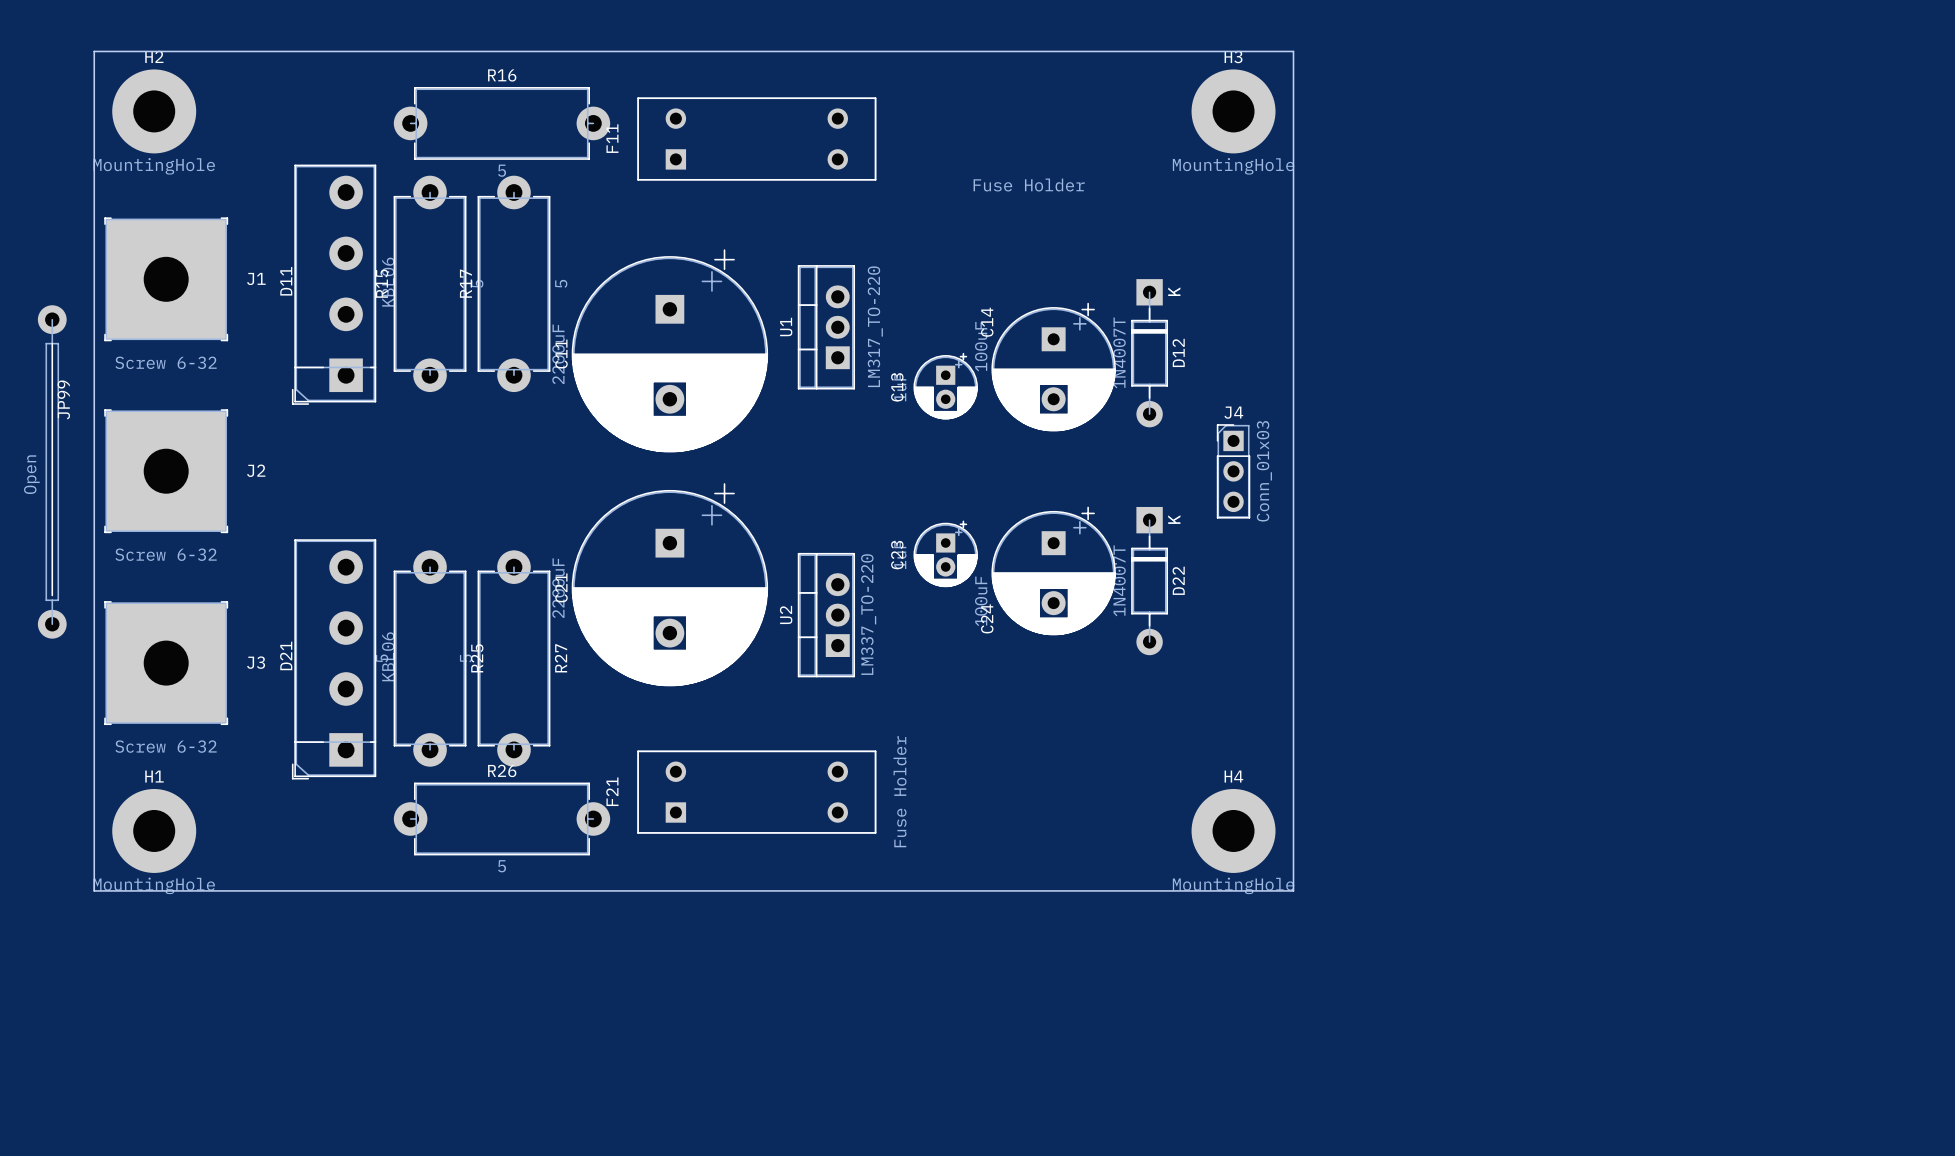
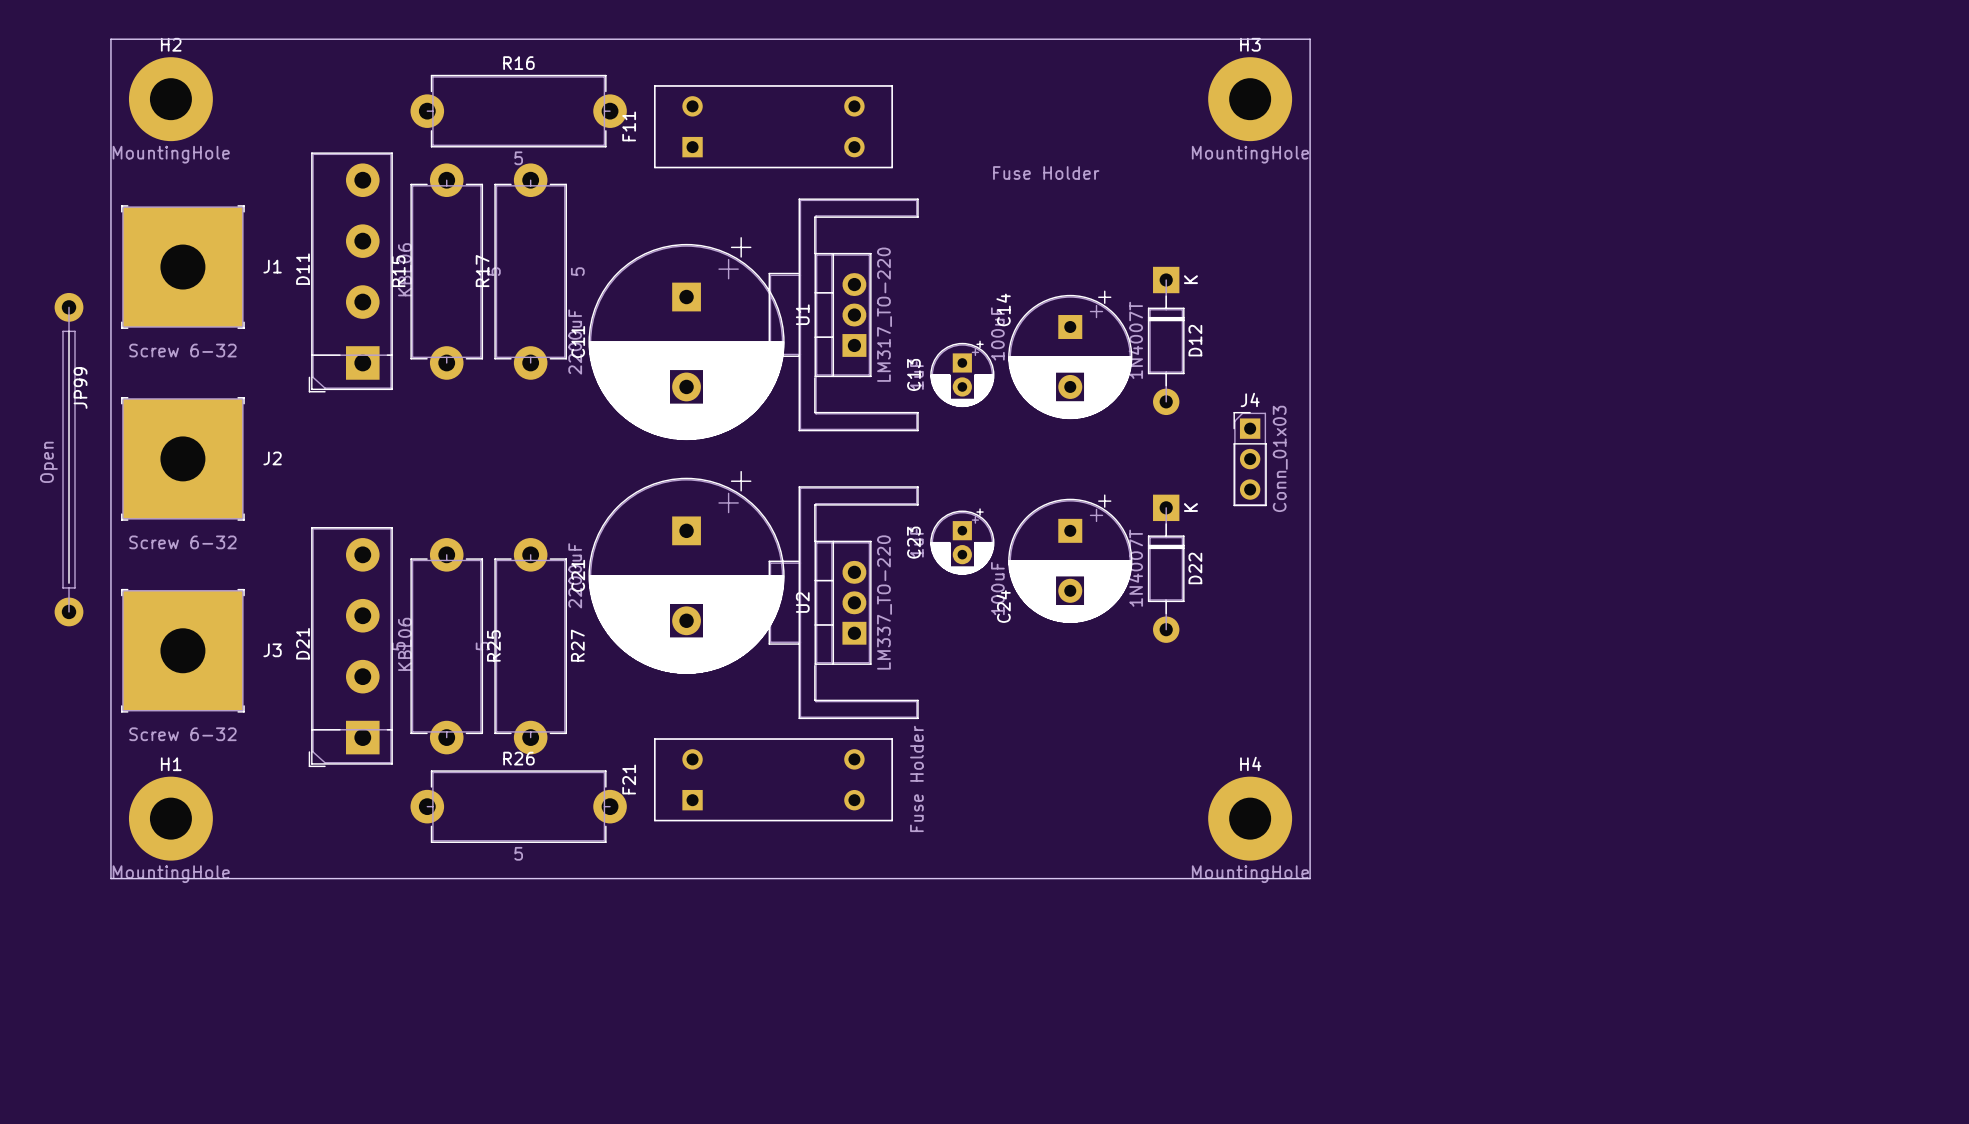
U1 footprint: [797, 265, 855, 390] -> [768, 198, 919, 432]
U2 footprint: [797, 552, 855, 678] -> [768, 486, 919, 720]

